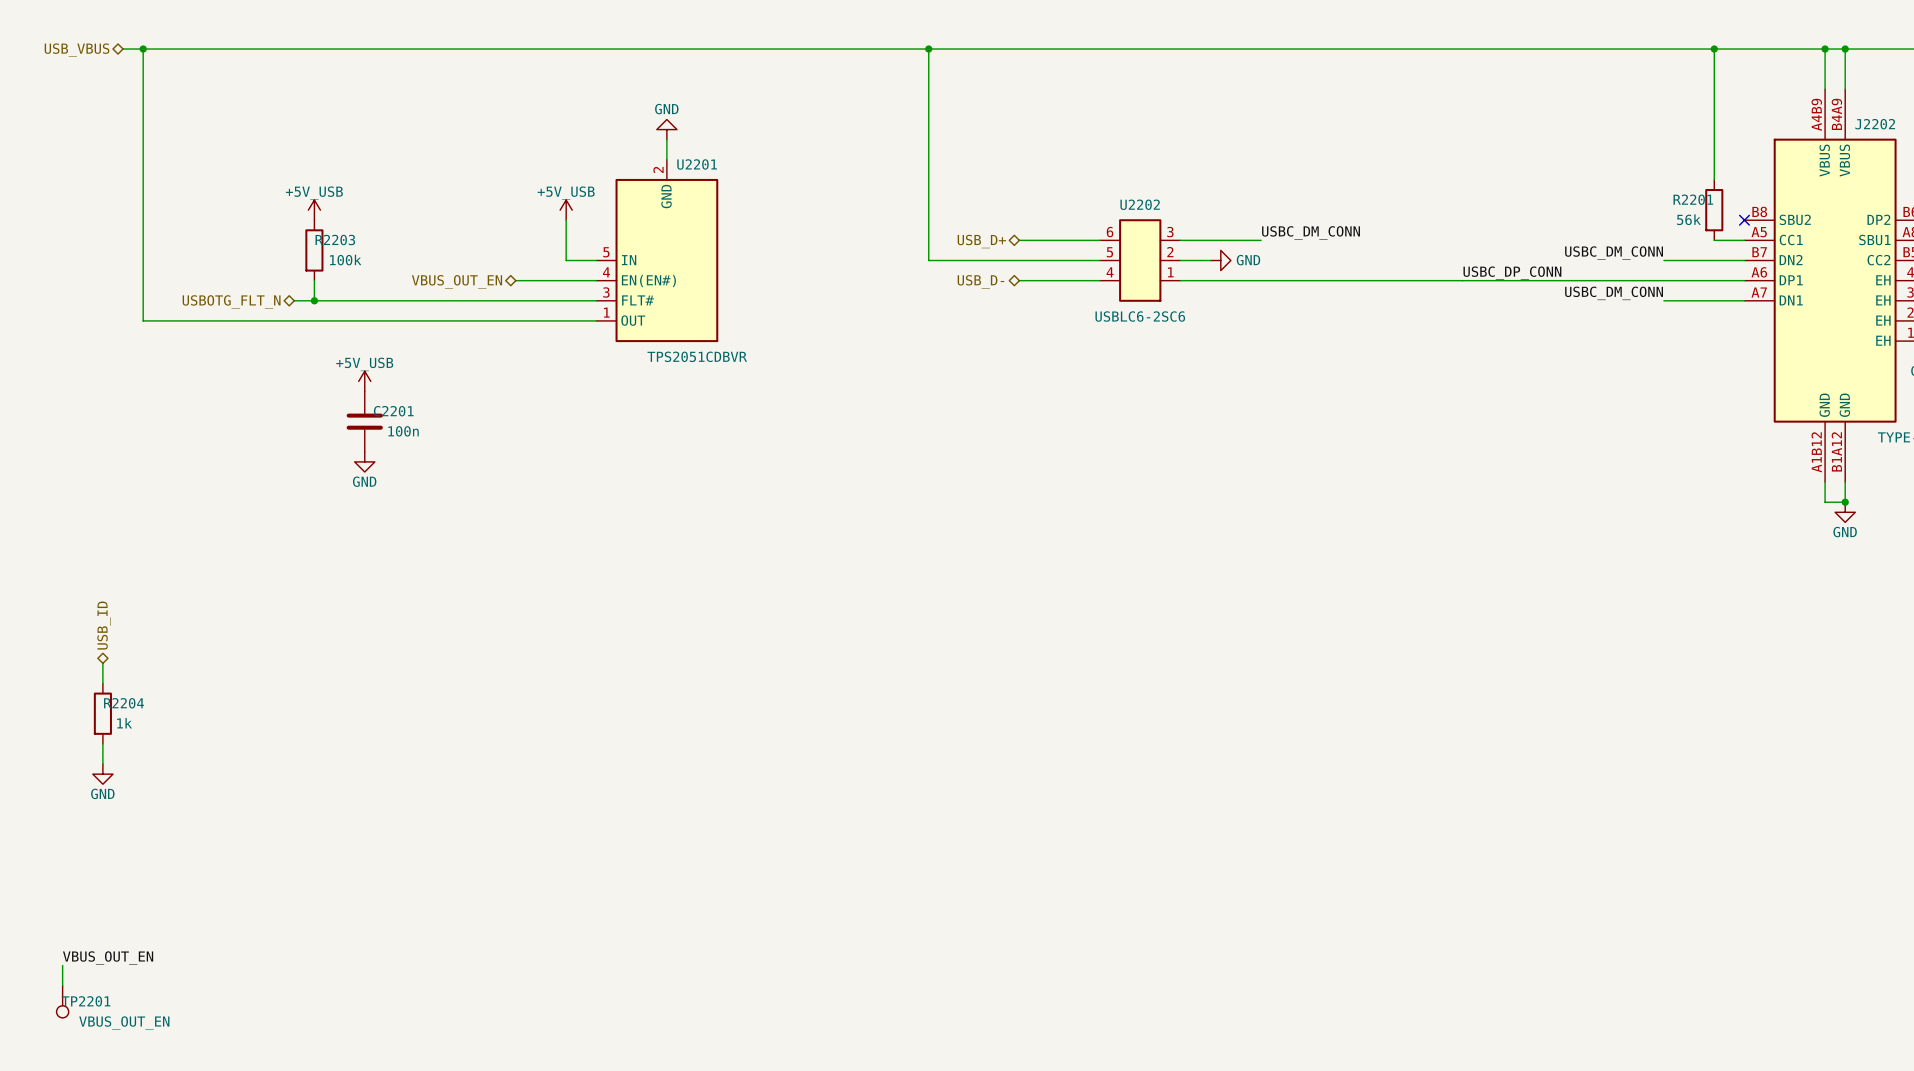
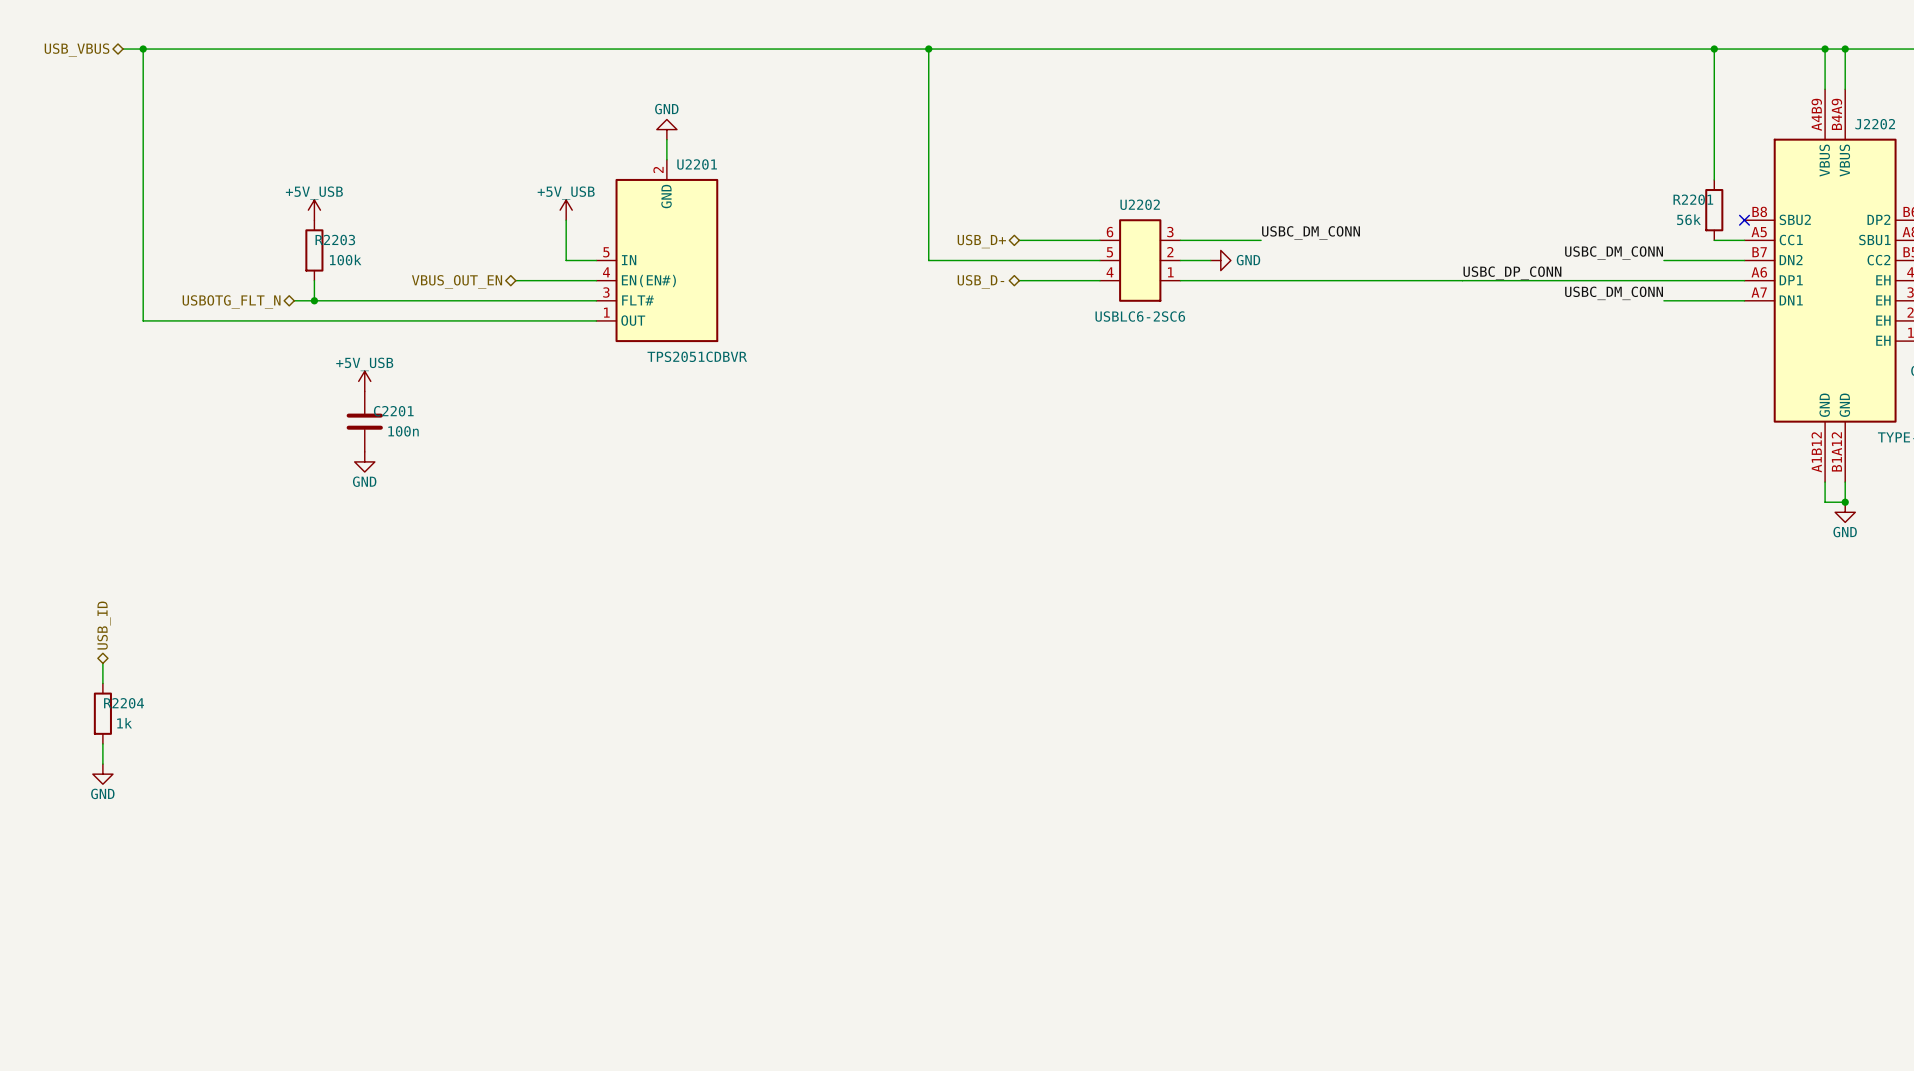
label: VBUS_OUT_EN (108, 958) -> none
wire: (62, 965) (62, 985) -> none
TP2201: VBUS_OUT_EN (62, 1001) -> none

